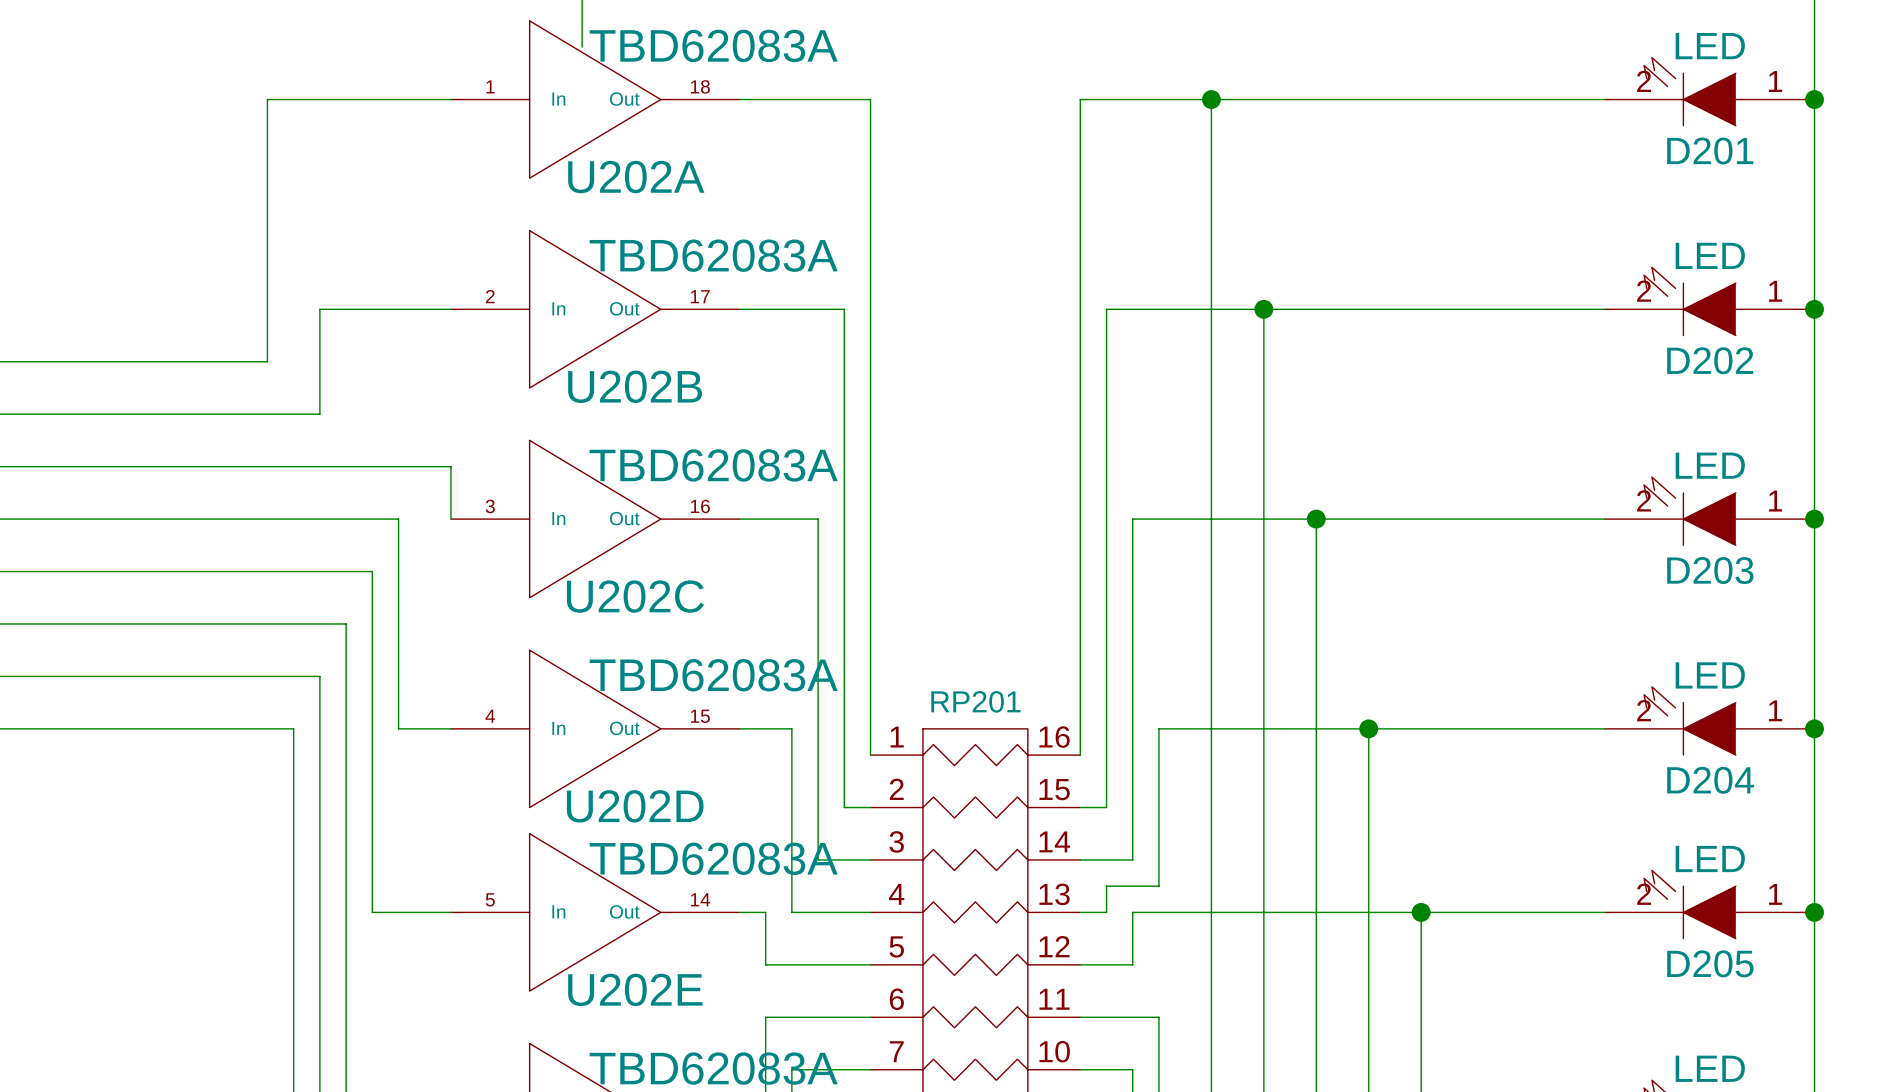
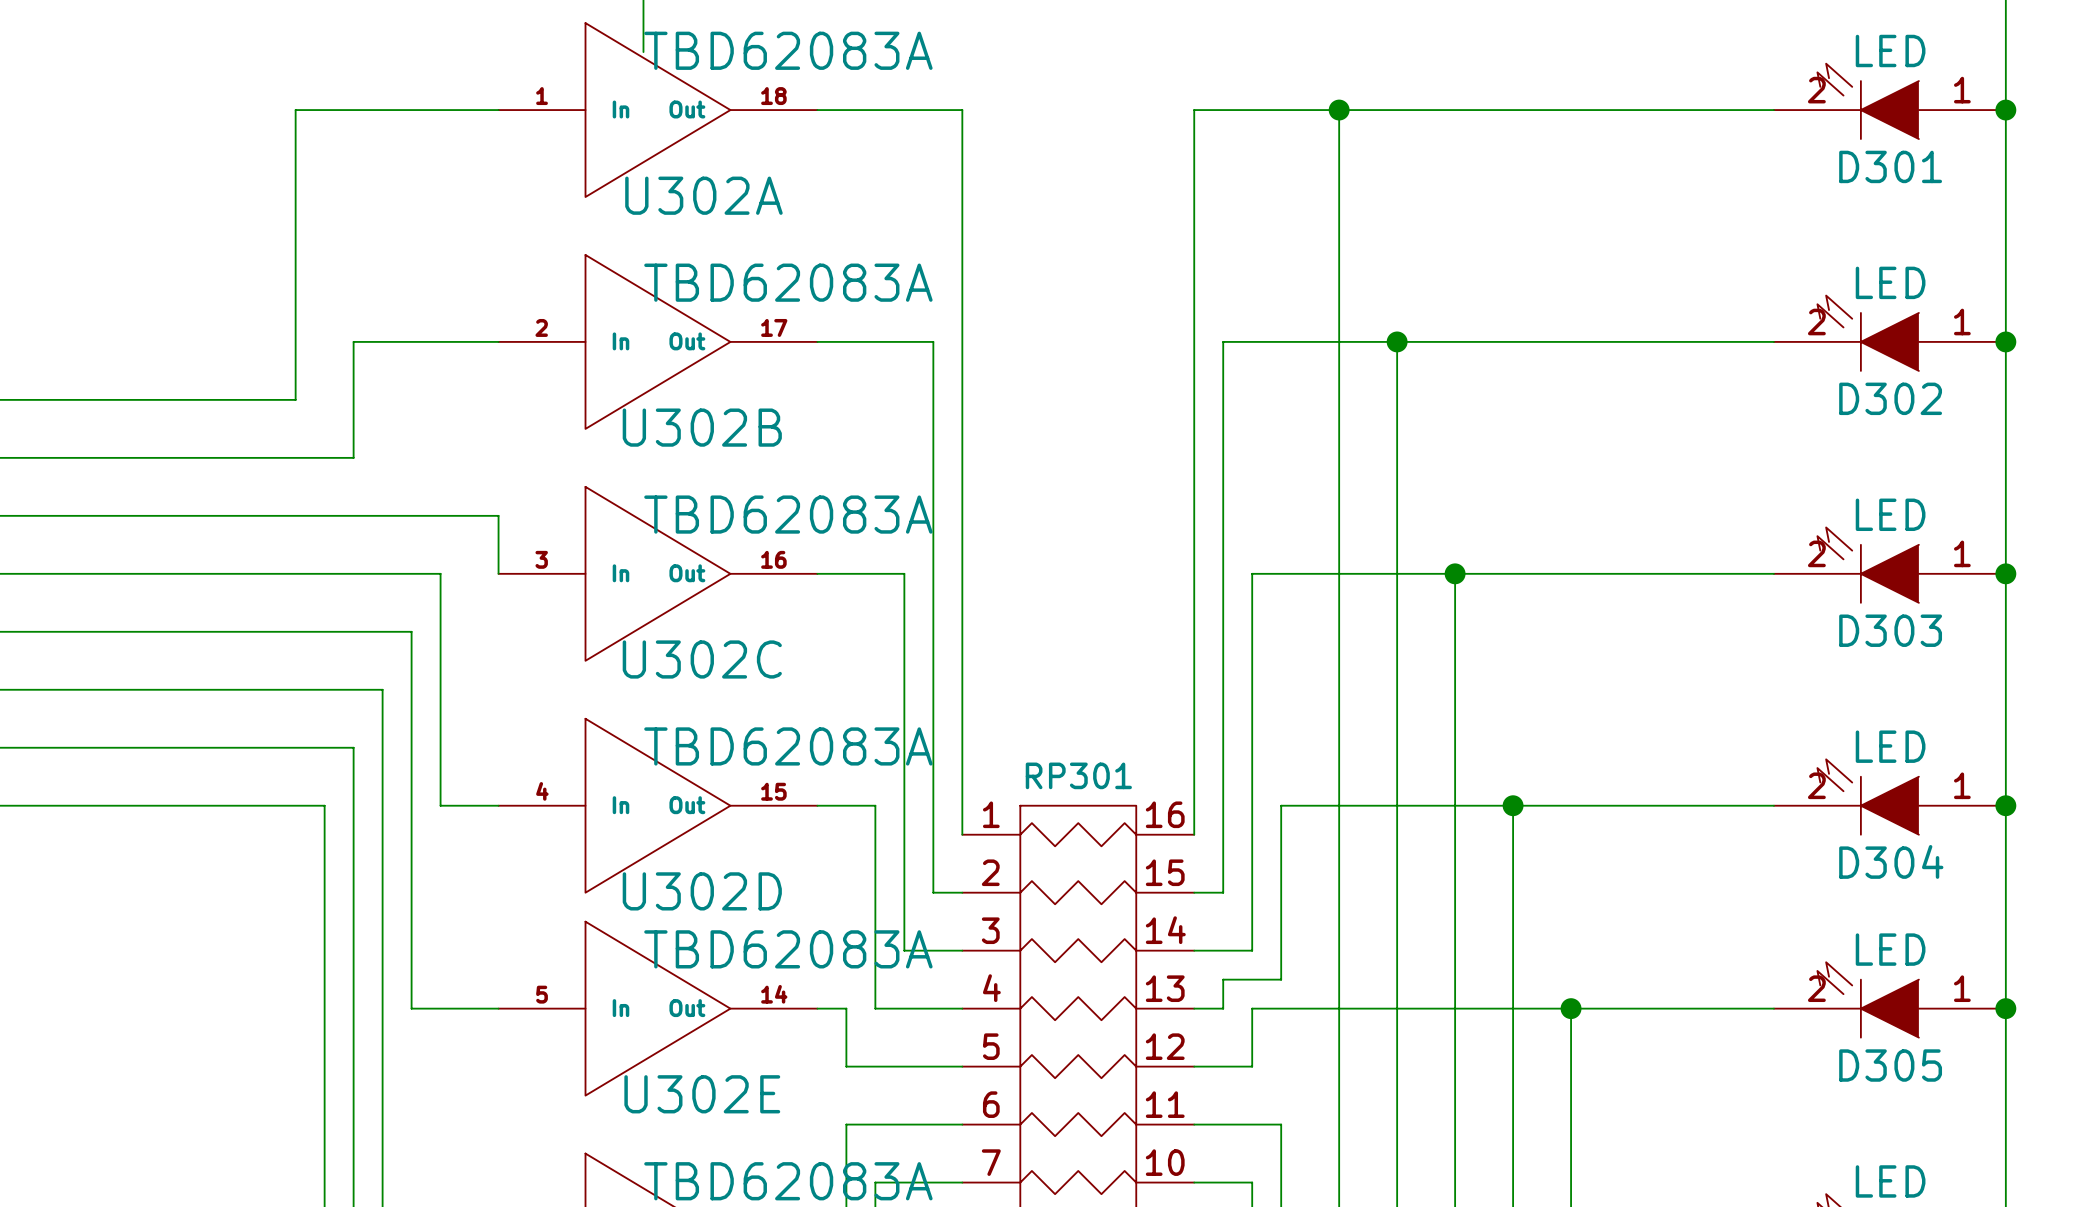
D201 name: D201 (1710, 151) -> D301 (1890, 166)
U202A name: U202A (636, 177) -> U302A (703, 195)
D202 name: D202 (1710, 360) -> D302 (1890, 398)
U202B name: U202B (635, 386) -> U302B (702, 427)
D203 name: D203 (1710, 570) -> D303 (1890, 630)
U202C name: U202C (635, 596) -> U302C (702, 659)
RP201 name: RP201 (975, 701) -> RP301 (1078, 775)
D204 name: D204 (1710, 780) -> D304 (1891, 861)
U202D name: U202D (635, 806) -> U302D (702, 891)
D205 name: D205 (1710, 963) -> D305 (1890, 1065)
U202E name: U202E (635, 989) -> U302E (702, 1094)

